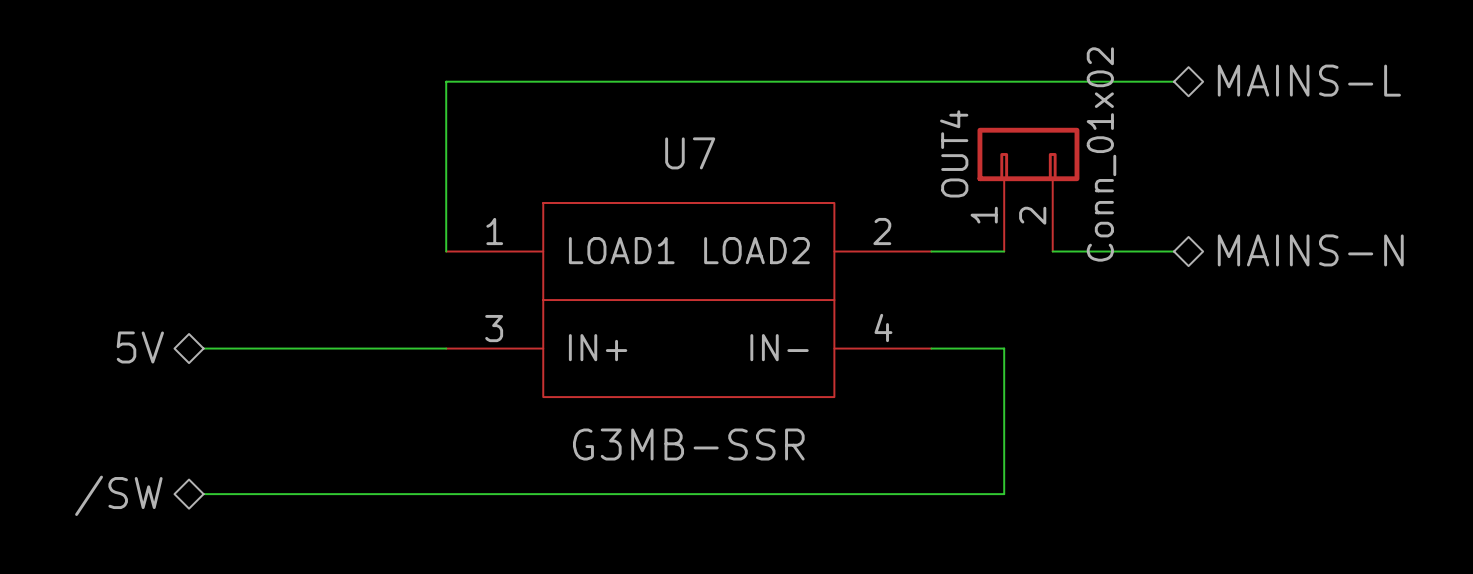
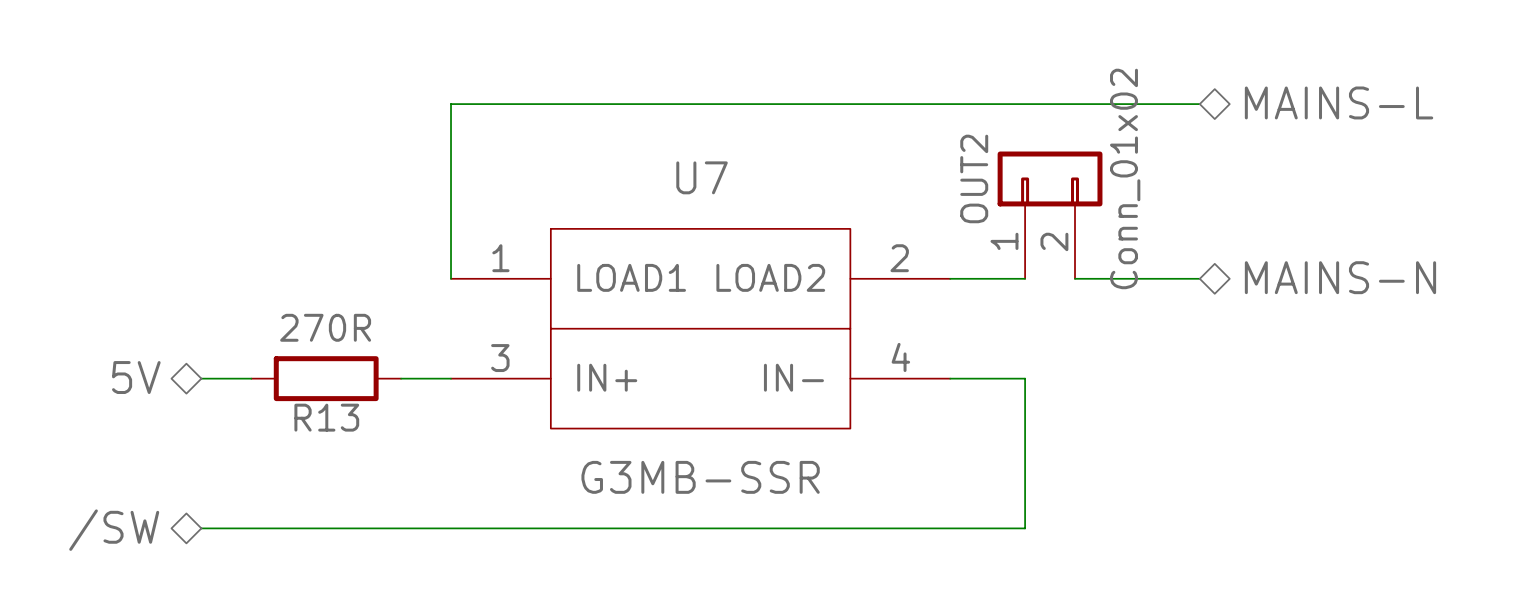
OUT4 name: OUT4 (954, 153) -> OUT2 (974, 178)
wire: (252, 348) (397, 348) -> none
R13: none -> 270R (326, 378)

